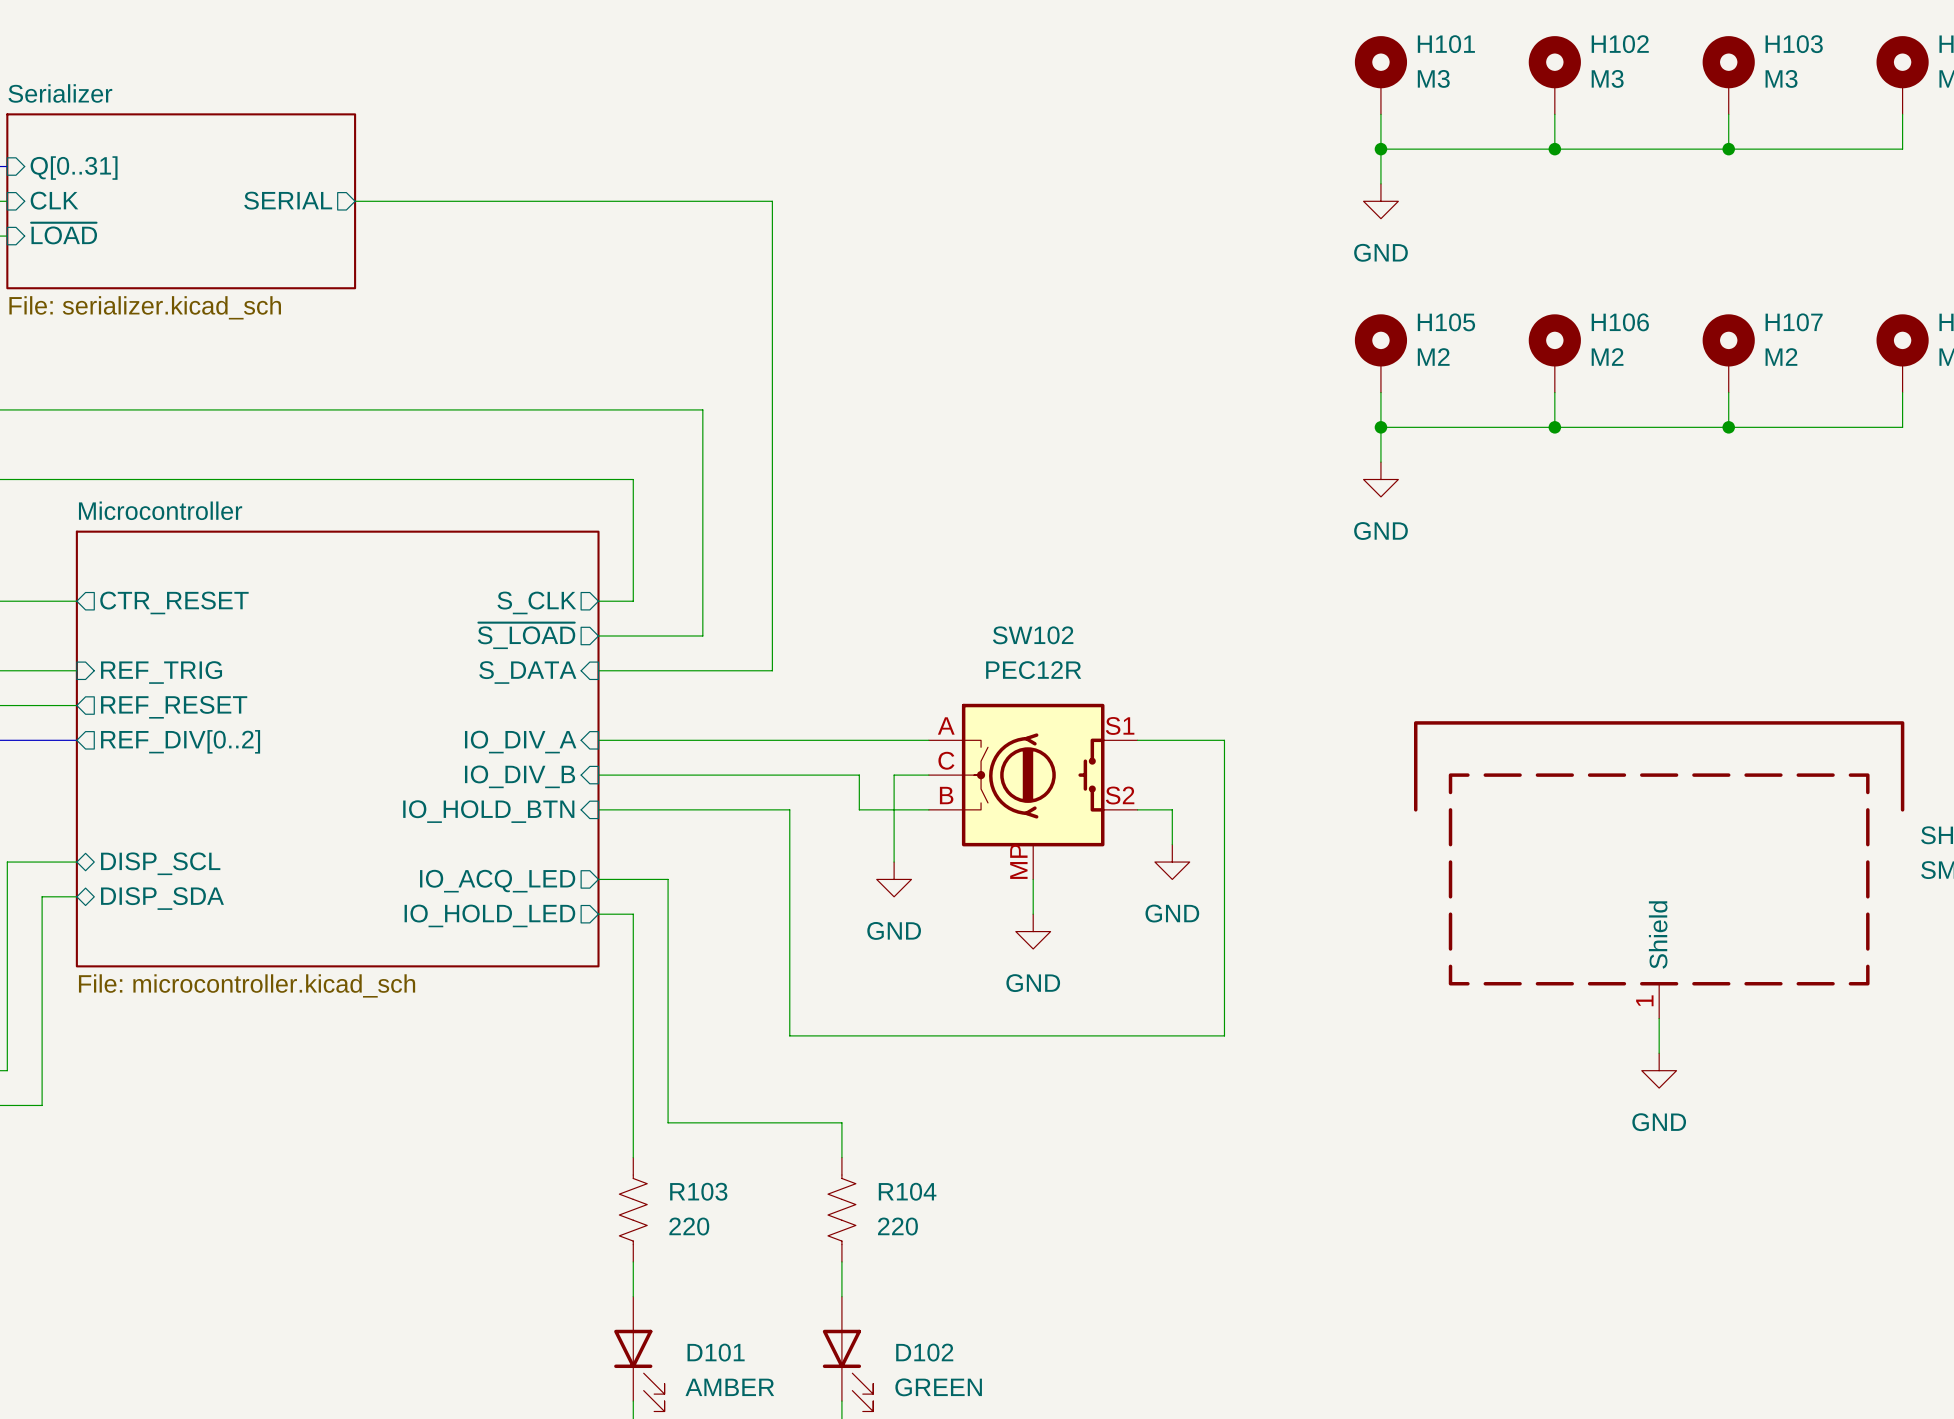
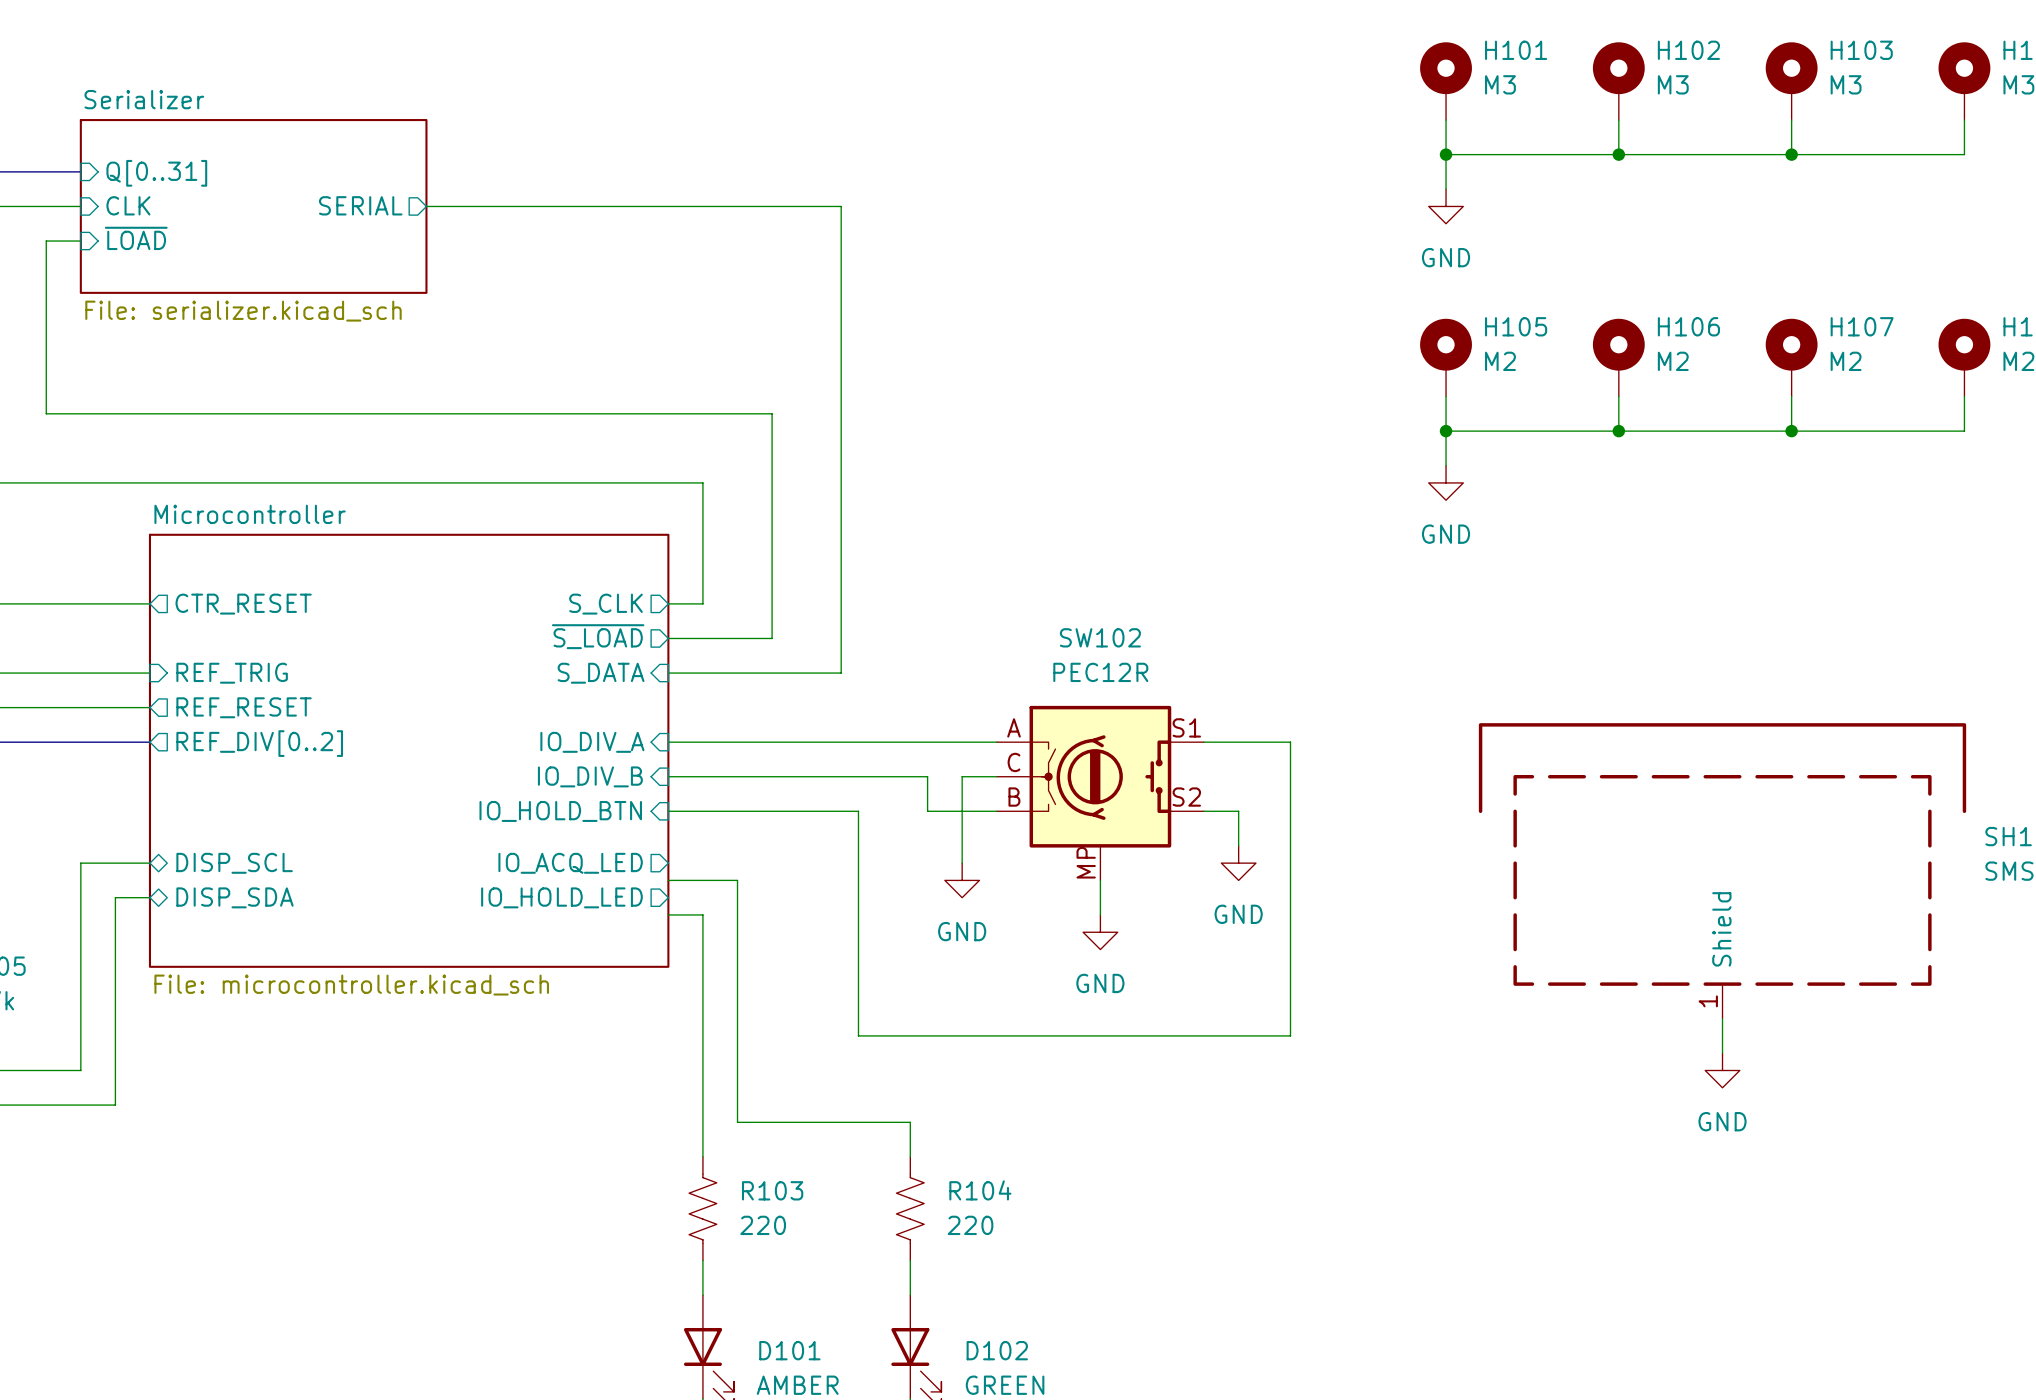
sheet pin position: IO_ACQ_LED (497, 881) -> IO_ACQ_LED (570, 863)
sheet pin position: IO_HOLD_LED (489, 915) -> IO_HOLD_LED (561, 897)

